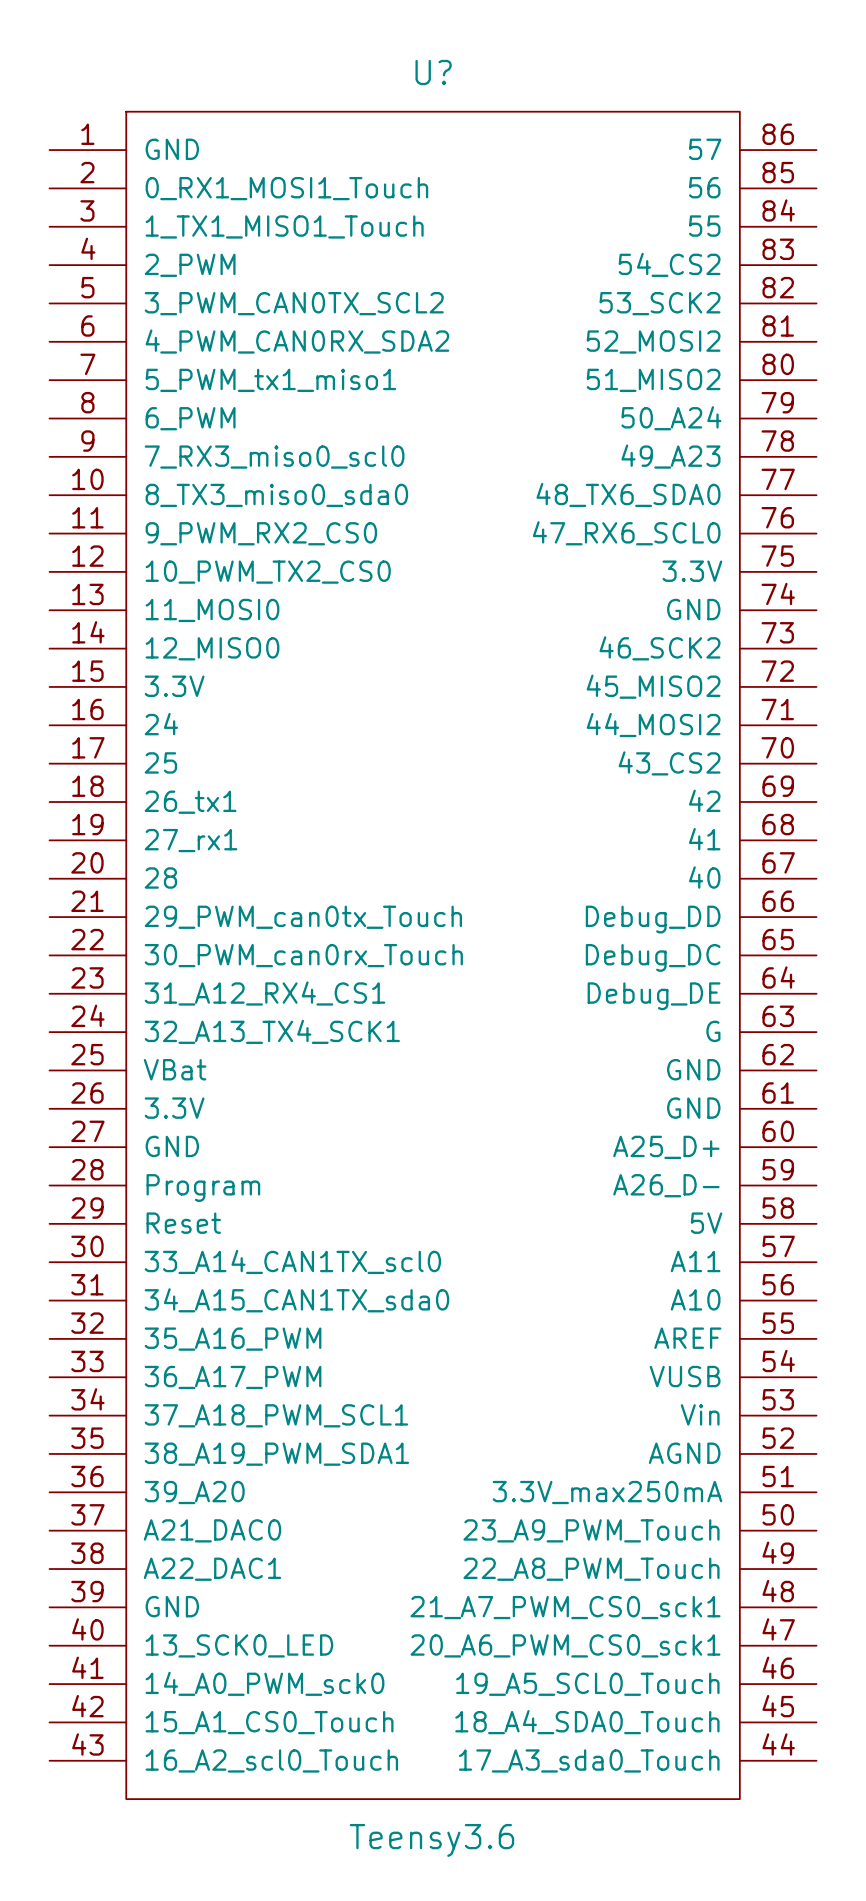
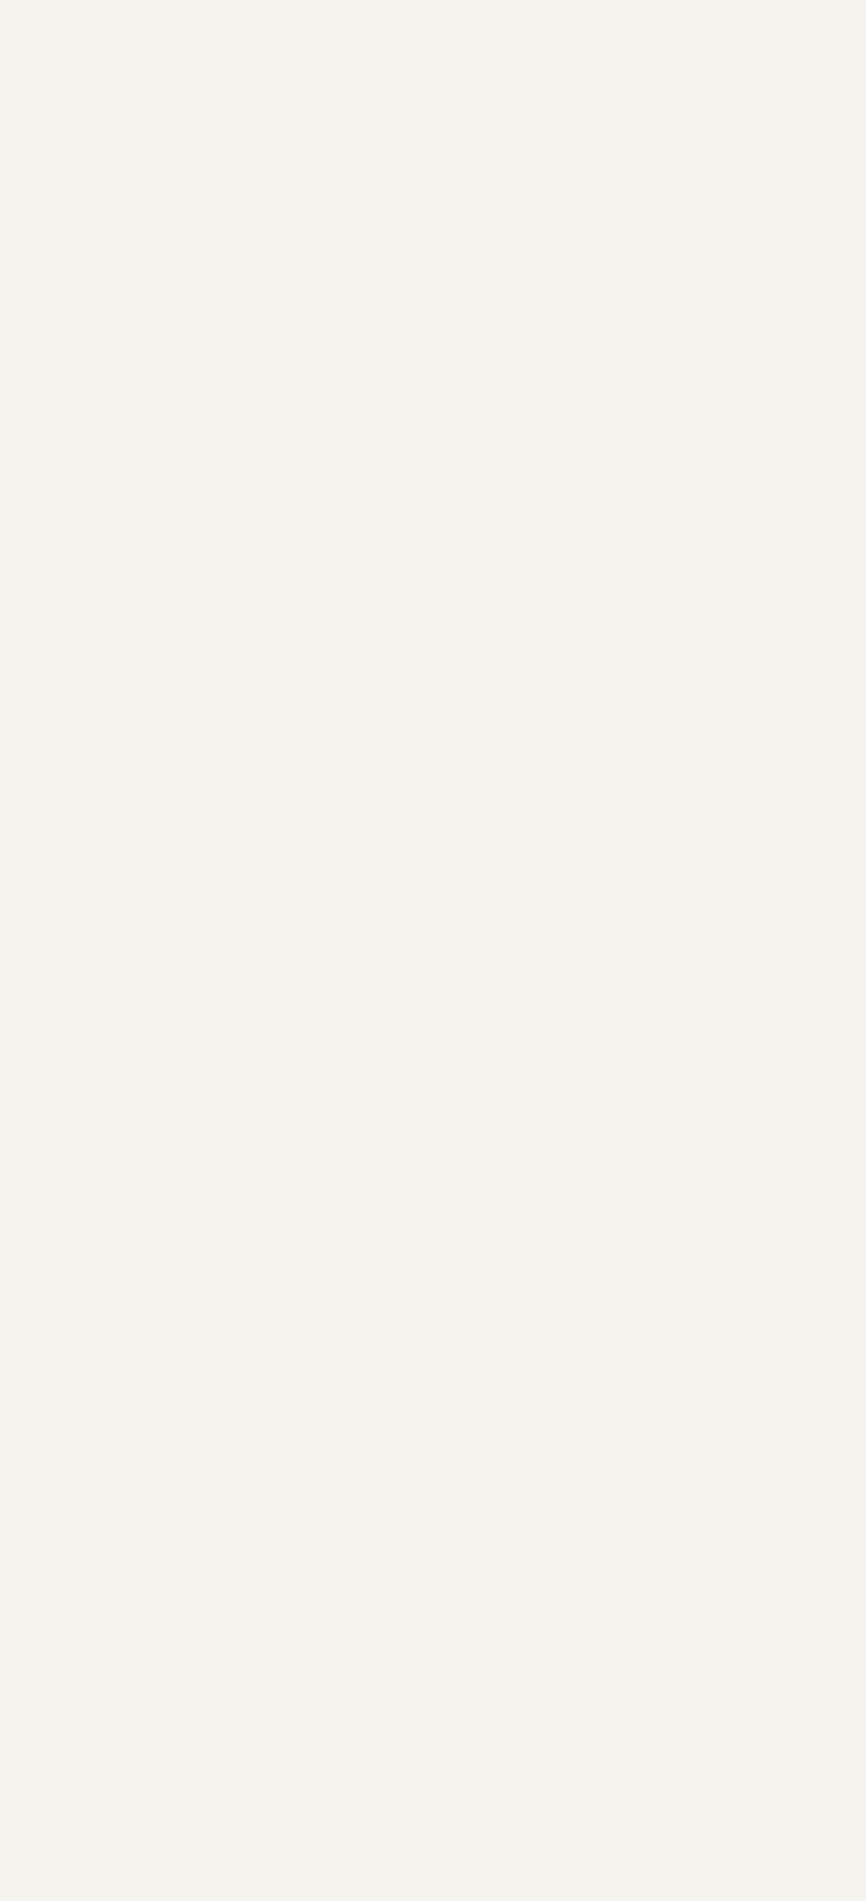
U?: Teensy3.6 (433, 955) -> none

